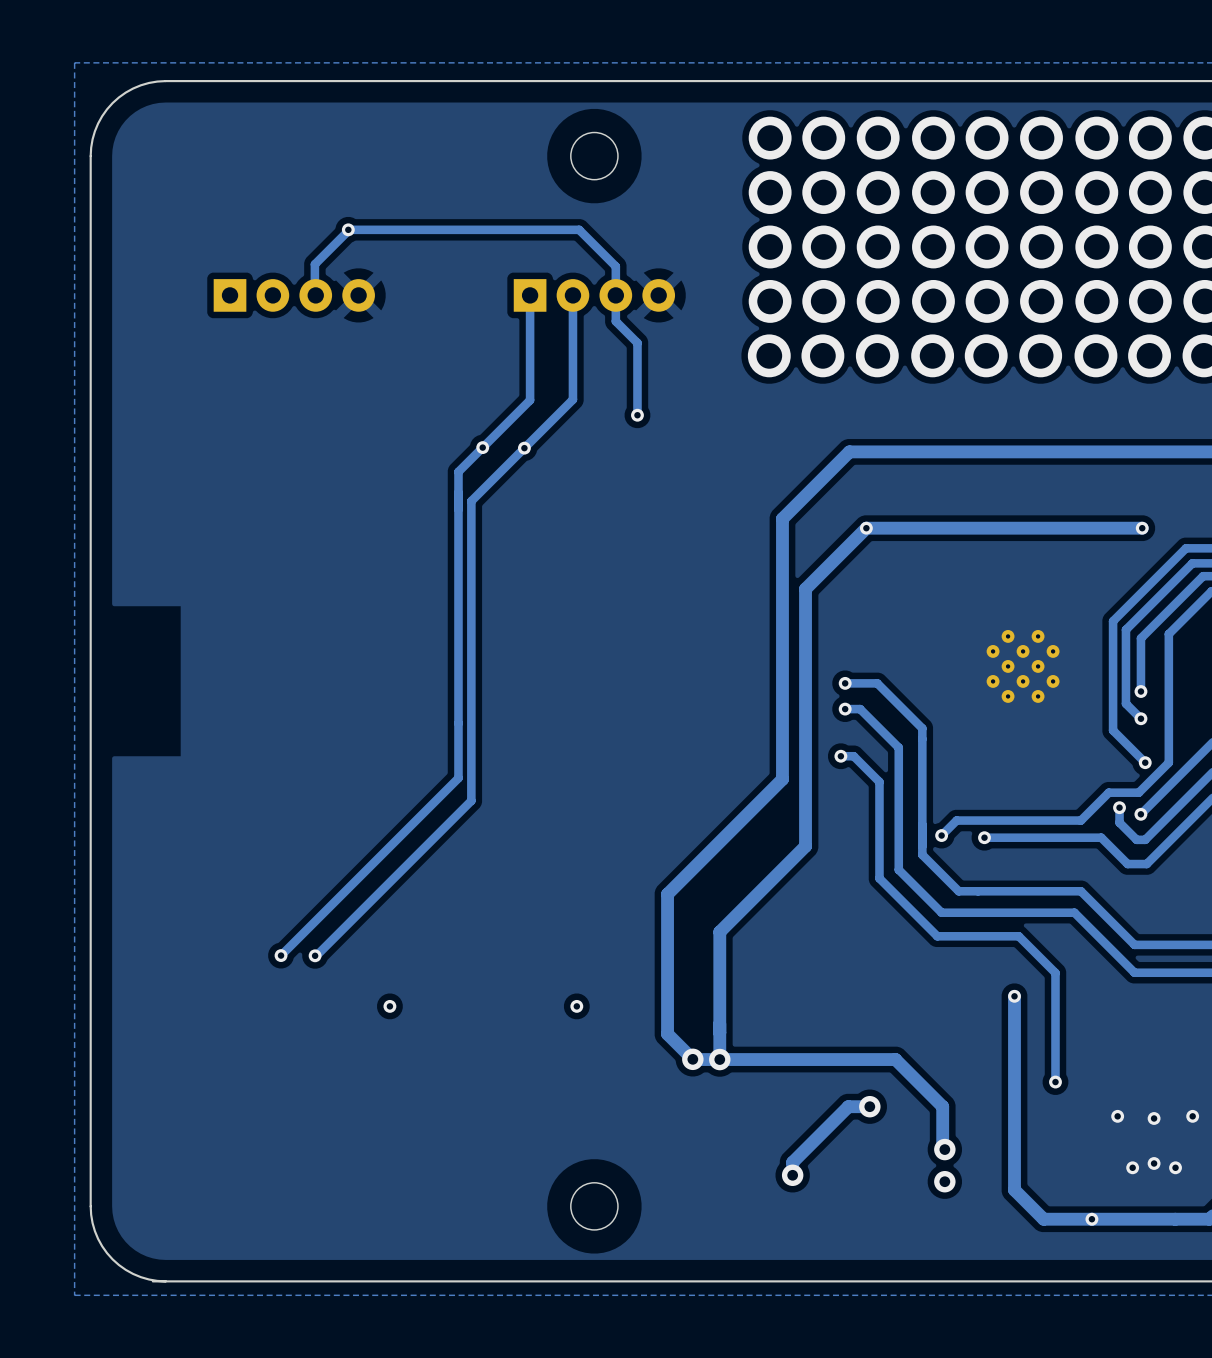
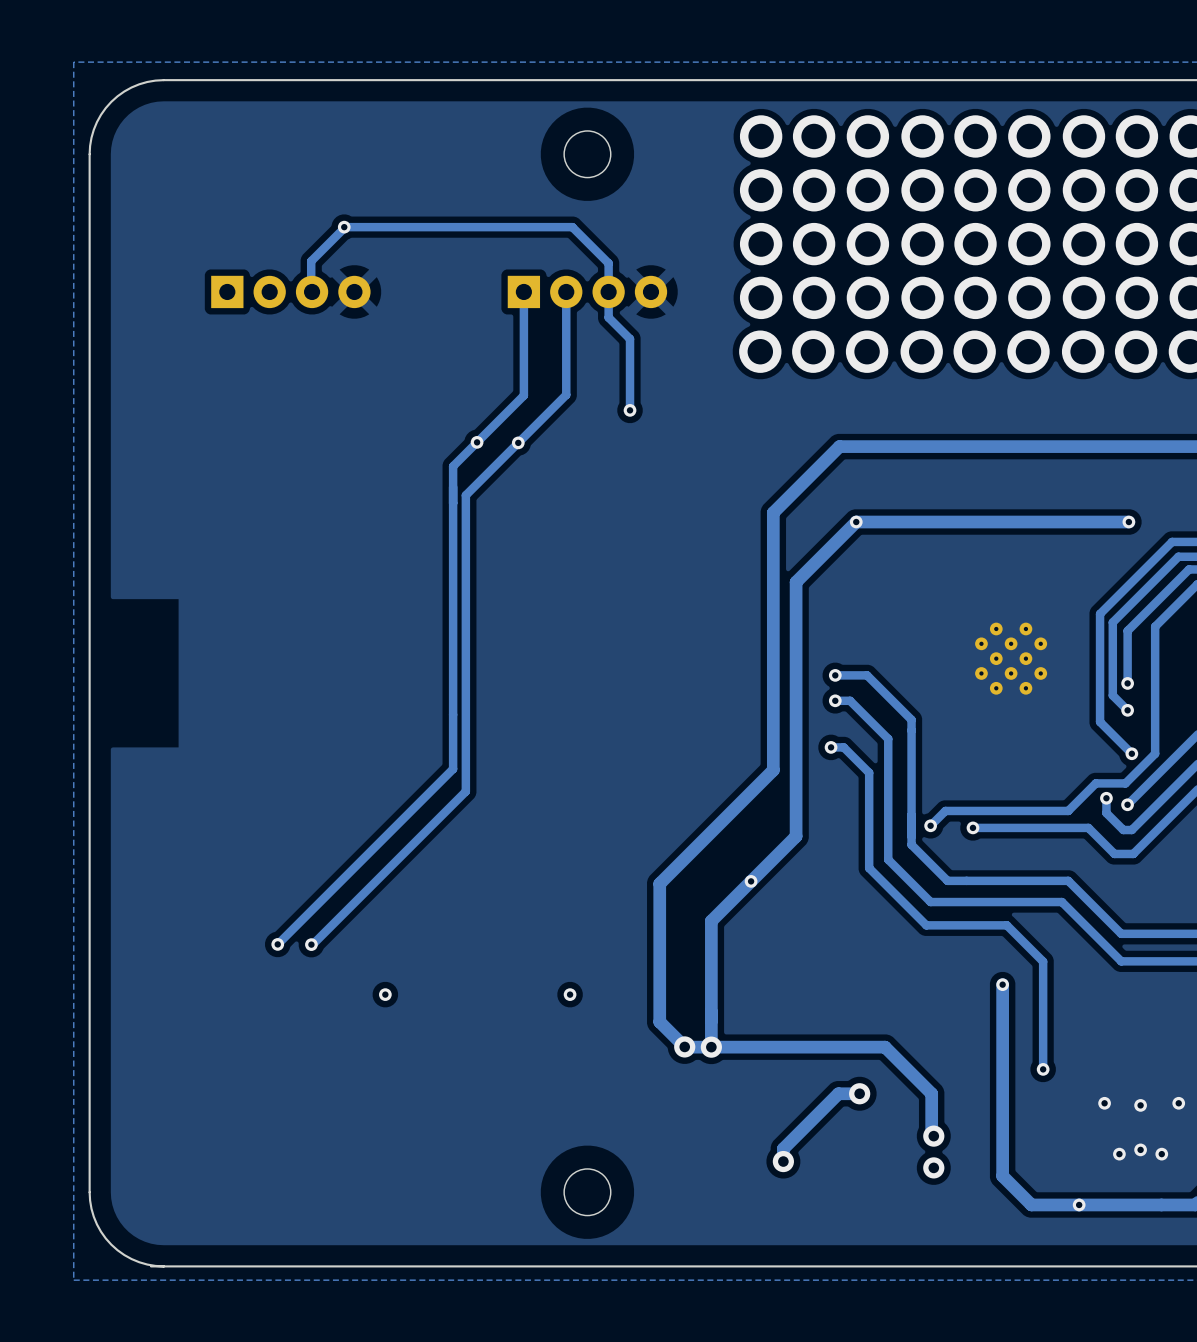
via: none -> (751, 881)

